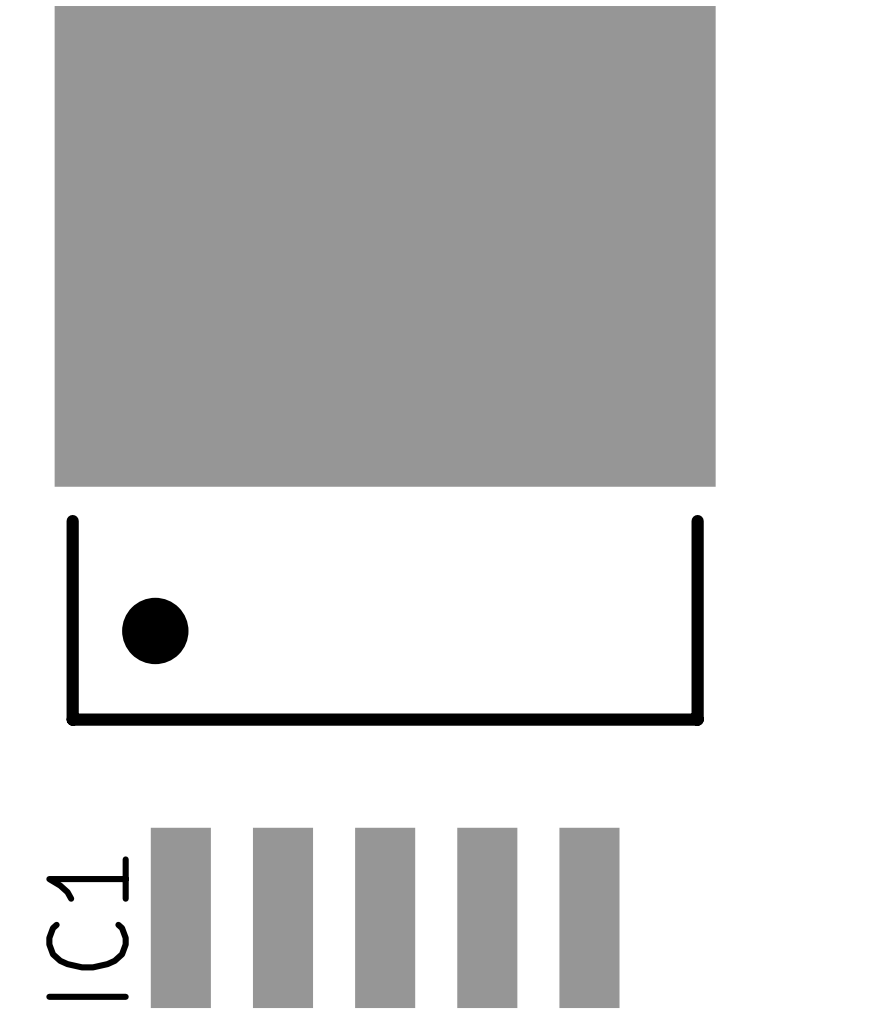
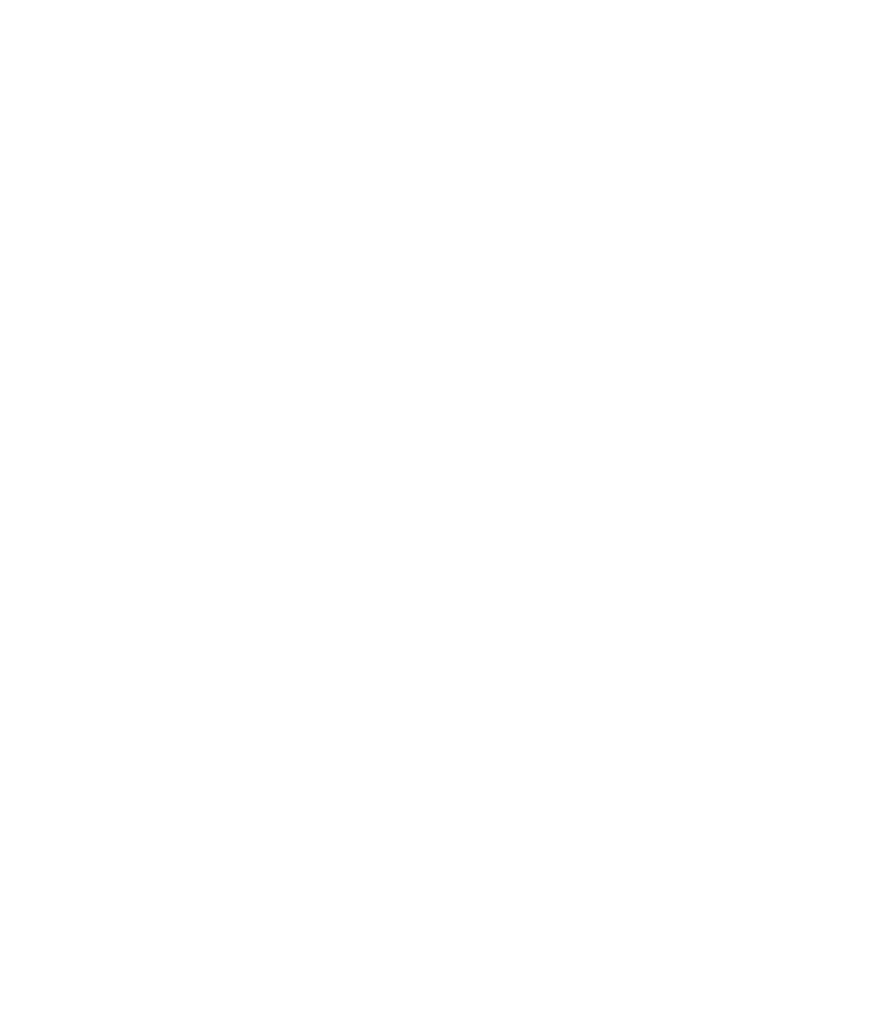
IC1: (385, 507) -> none

